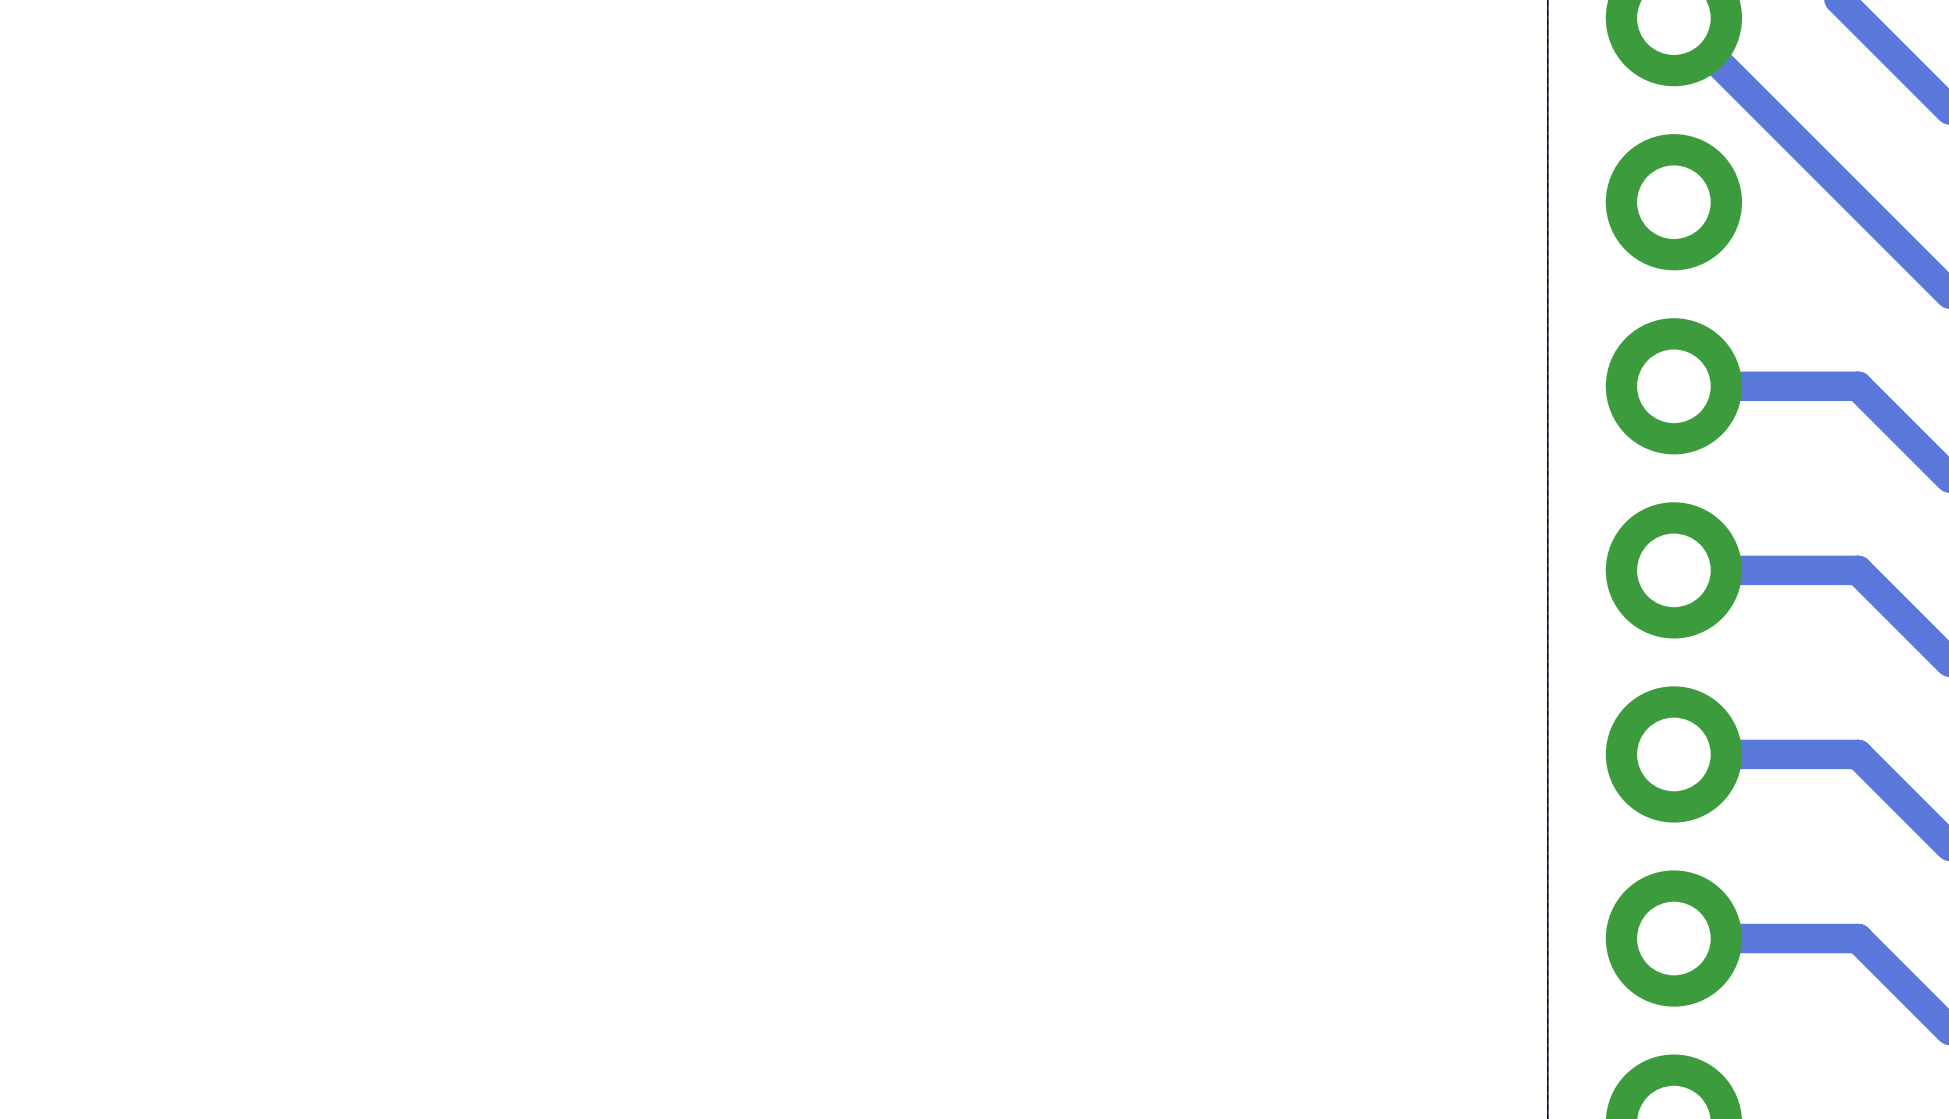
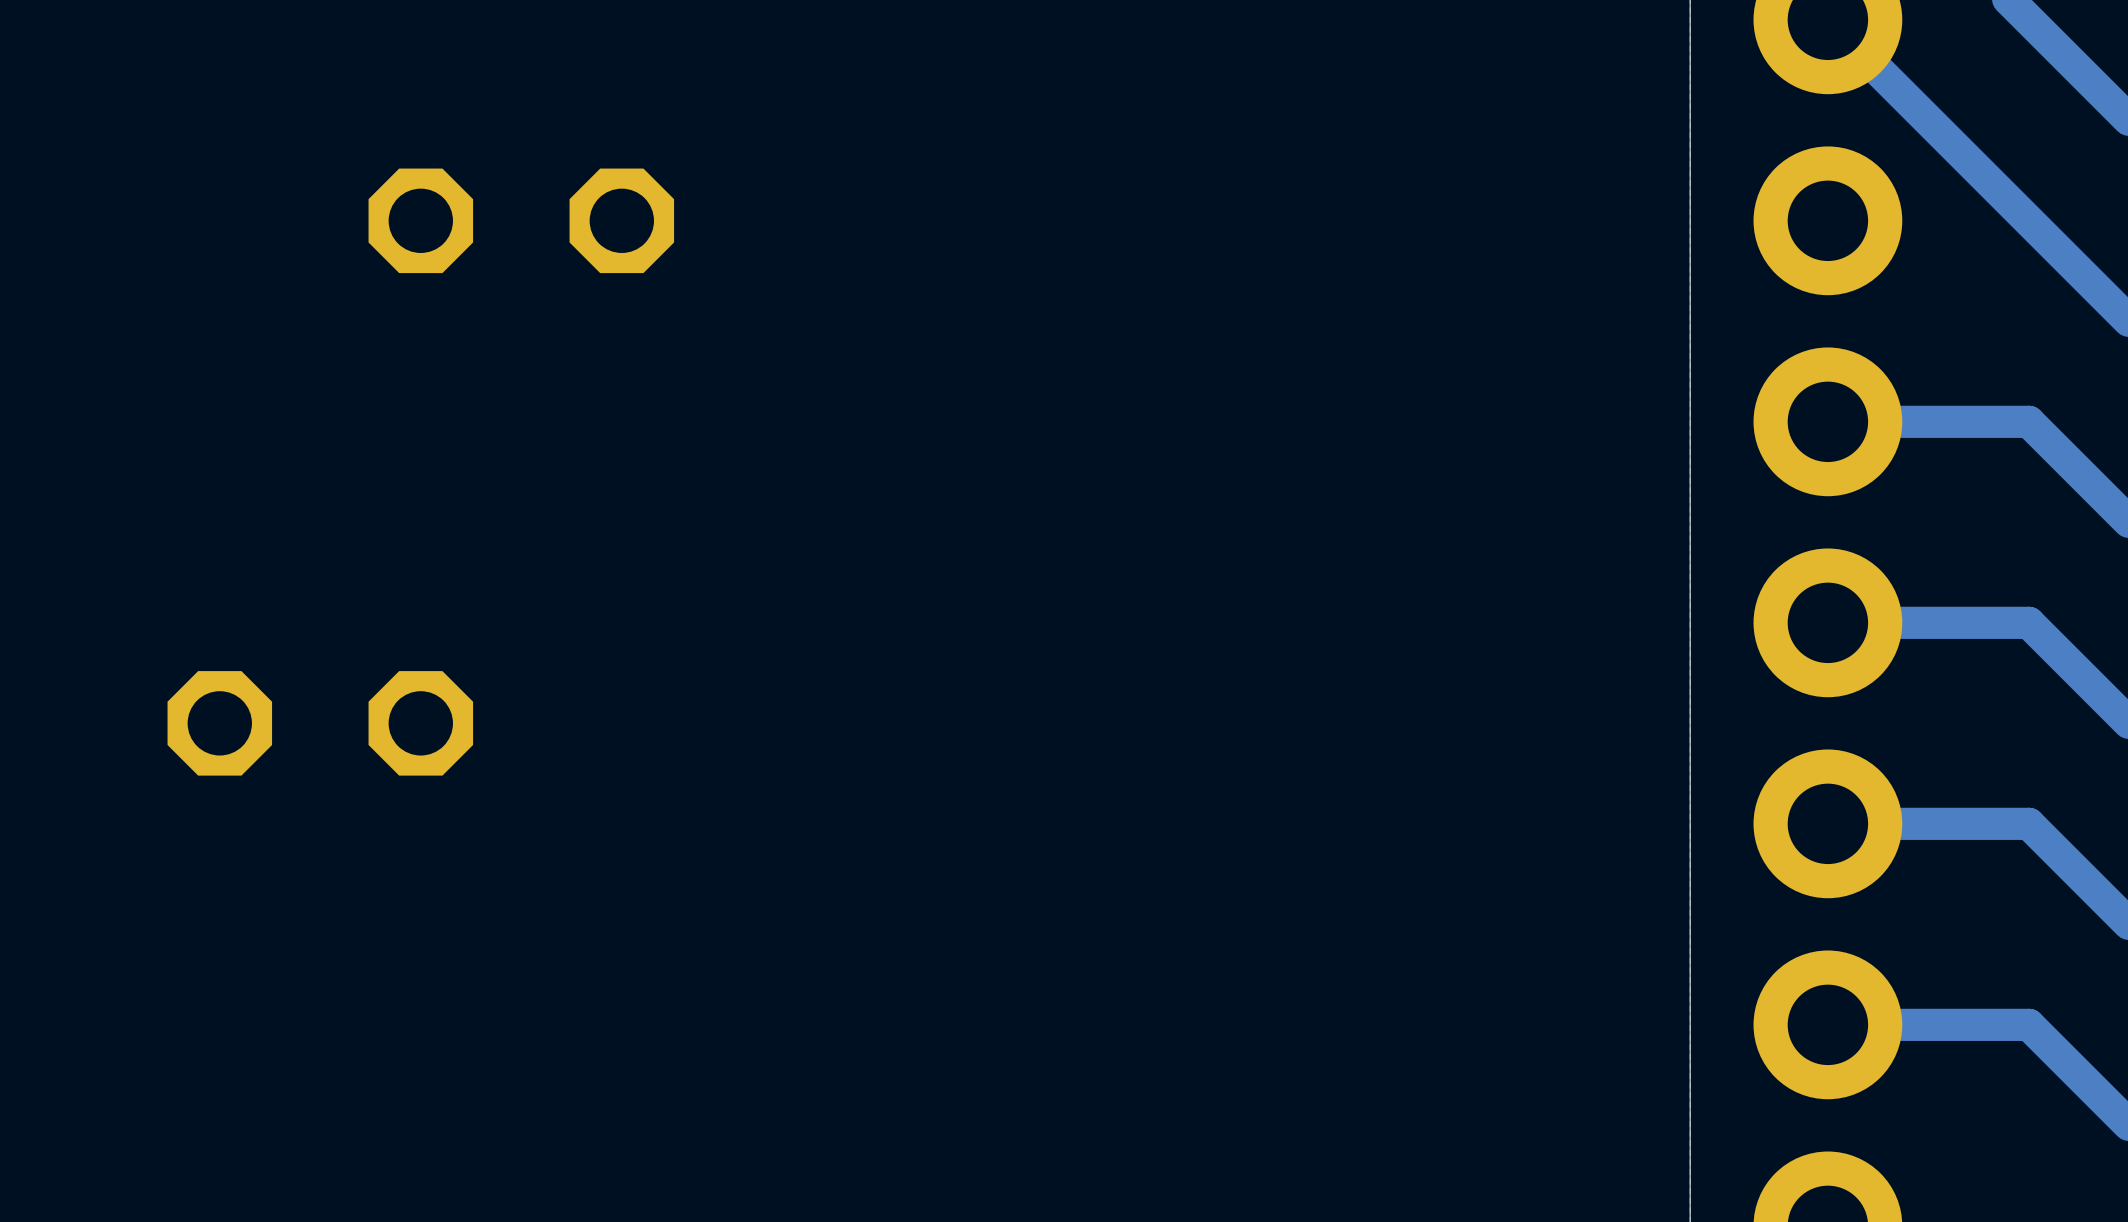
part: none -> (521, 220)
part: none -> (320, 723)

